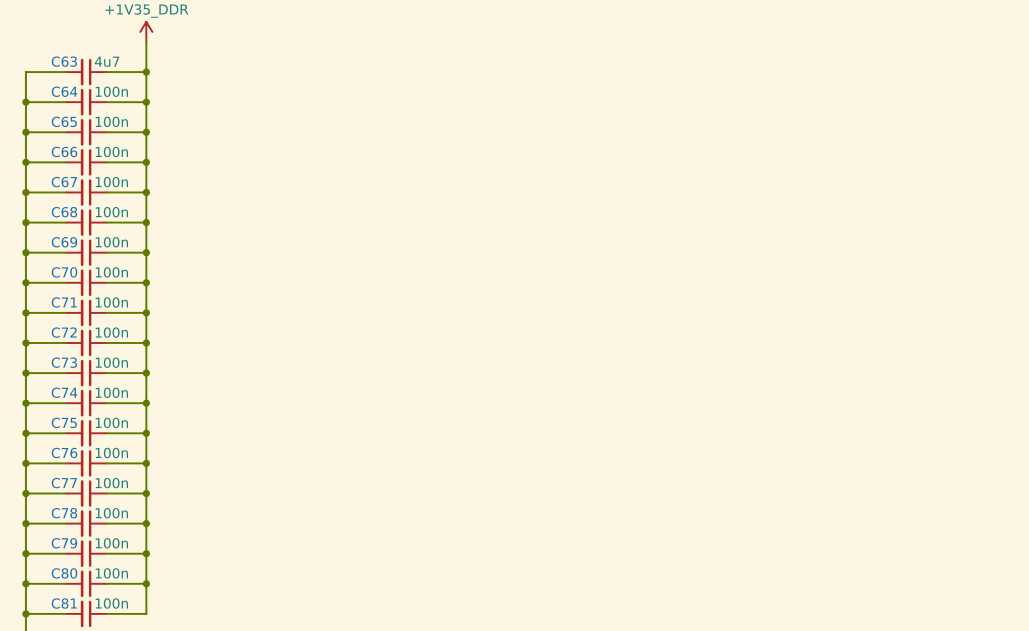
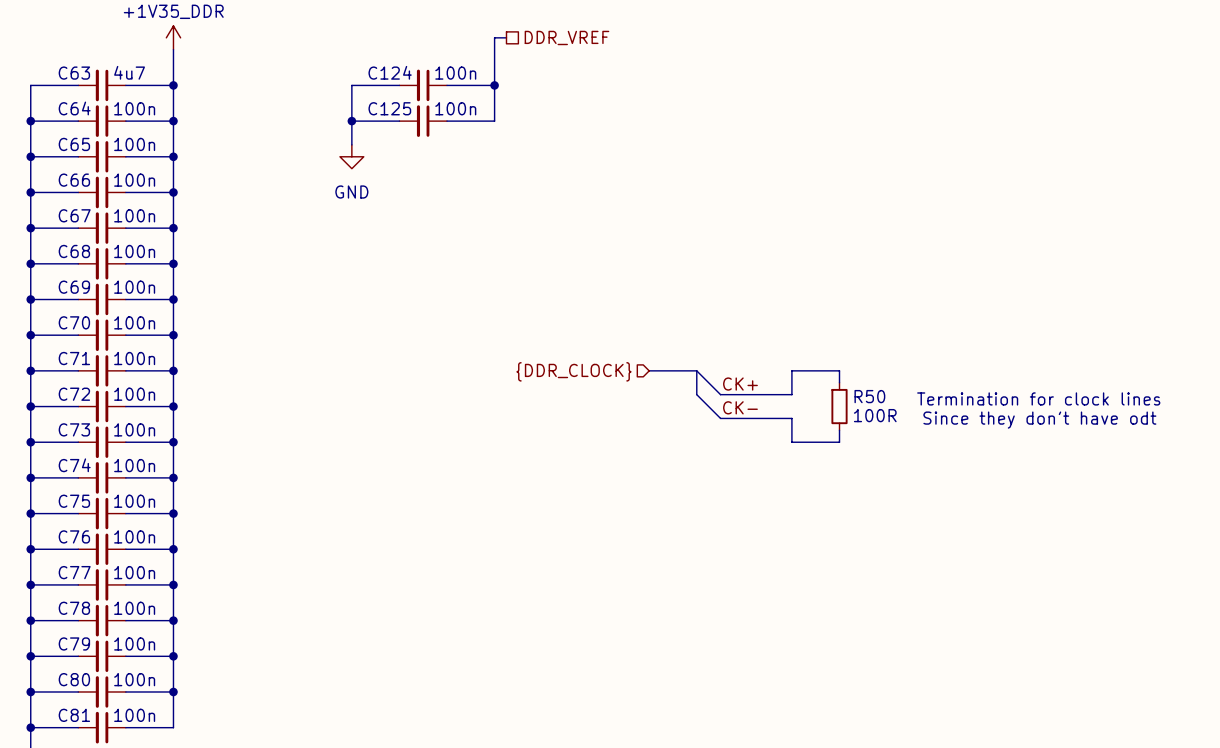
wire: none -> (506, 37) (494, 37) (494, 121) (447, 121)
hierarchical label: none -> DDR_VREF (566, 37)
wire: none -> (399, 85) (351, 85) (351, 144)
C124: none -> 100n (423, 85)
wire: none -> (447, 85) (494, 85)
junction: none -> (494, 85)
wire: none -> (351, 121) (399, 121)
junction: none -> (351, 121)
C125: none -> 100n (423, 121)
power symbol: none -> GND (351, 156)
bus: none -> (649, 370) (696, 370) (696, 394)
wire: none -> (696, 370) (720, 394) (791, 394) (791, 370) (839, 370) (839, 382)
hierarchical label: none -> {DDR_CLOCK} (573, 371)
label: none -> CK+ (740, 384)
wire: none -> (696, 394) (720, 418) (791, 418) (791, 442) (839, 442) (839, 430)
text: none -> Termination for clock lines (1038, 398)
R50: none -> 100R (839, 406)
label: none -> CK- (740, 407)
text: none -> Since they don't have odt (1039, 420)

